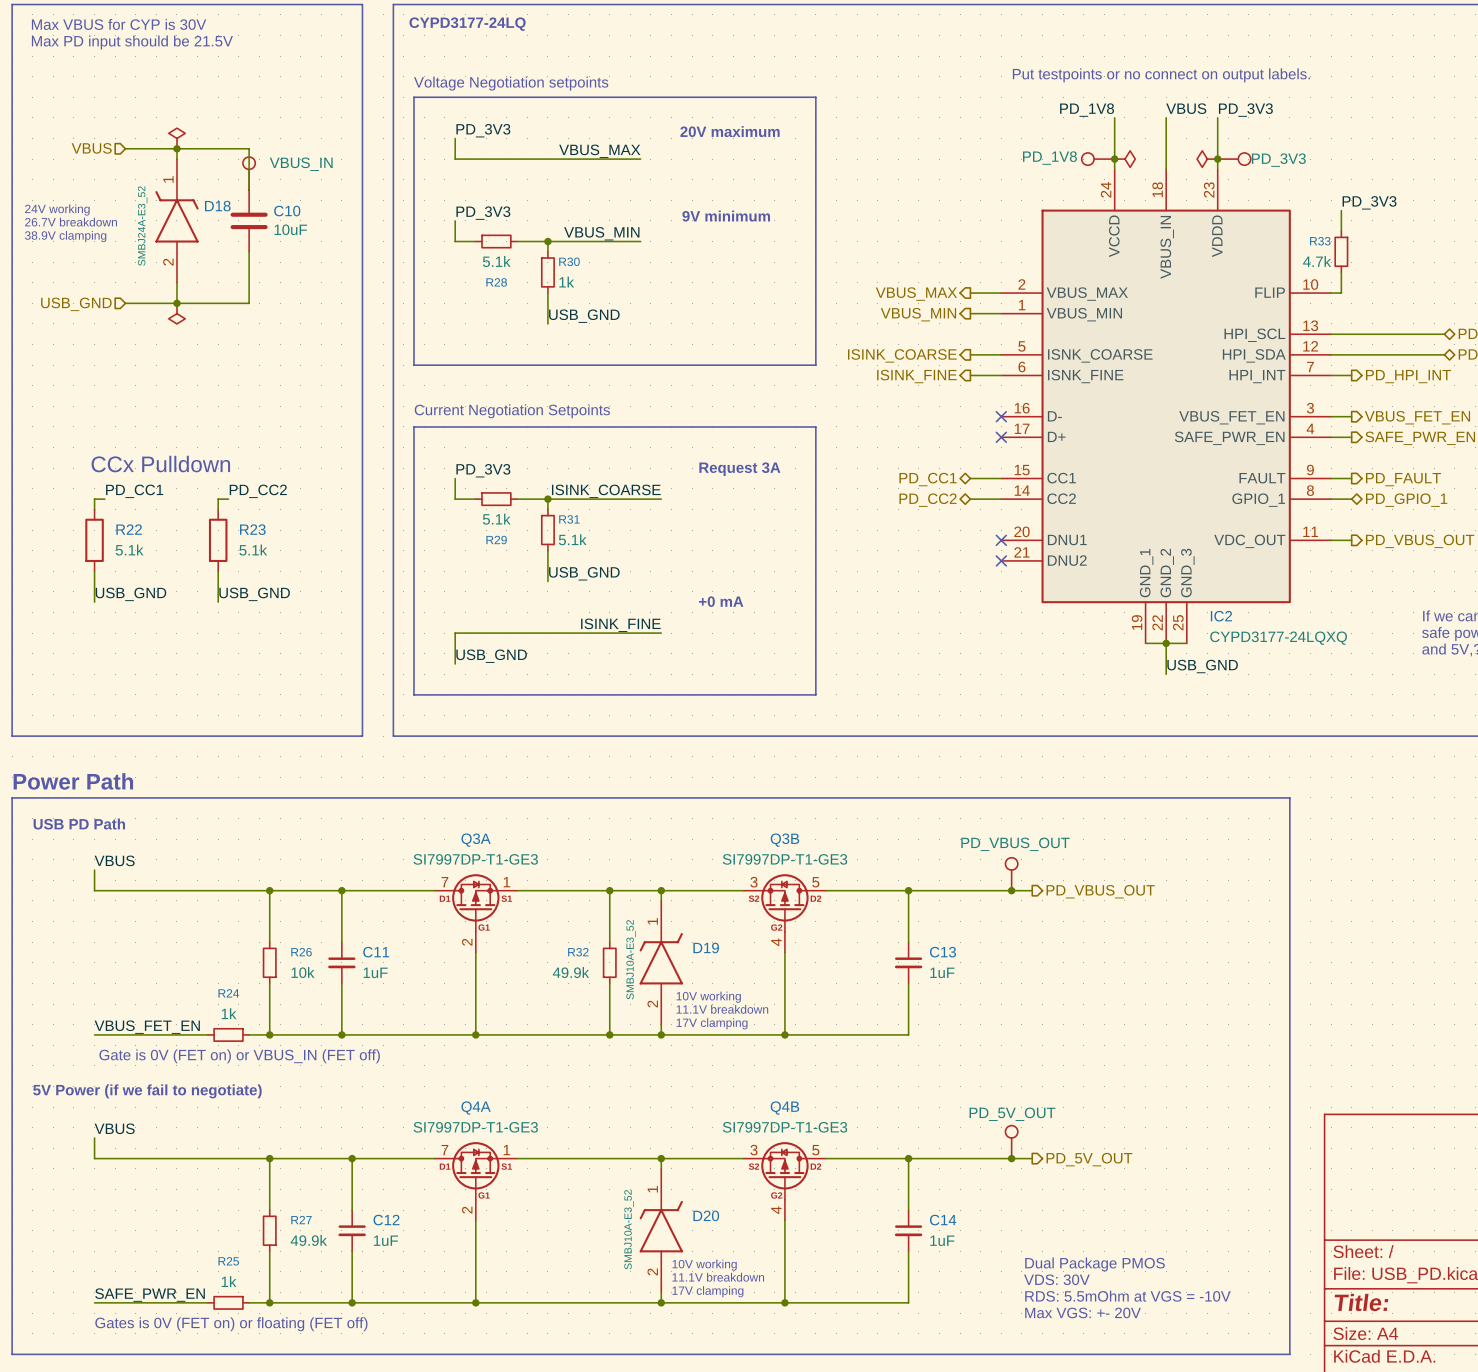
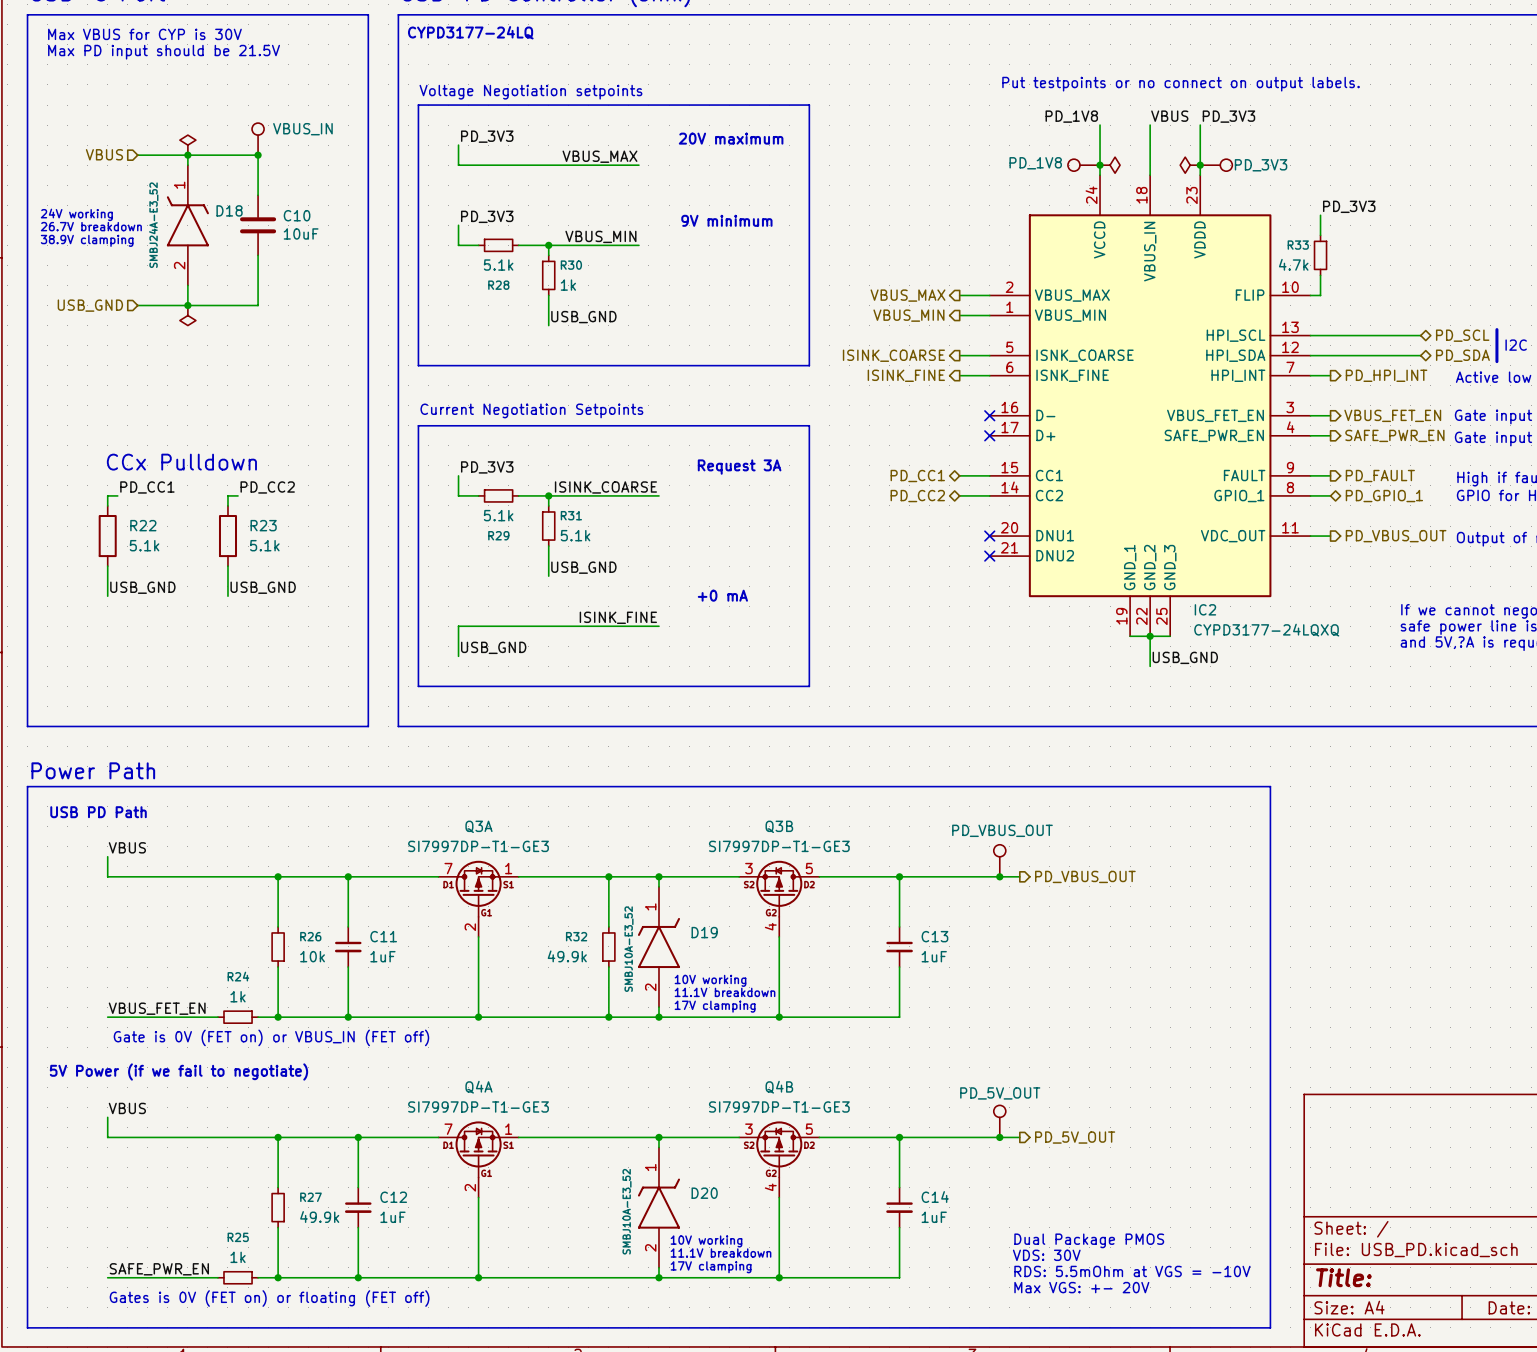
junction: none -> (258, 155)
part value position: VBUS_IN (301, 164) -> VBUS_IN (302, 129)
part position: (249, 173) -> (258, 139)

